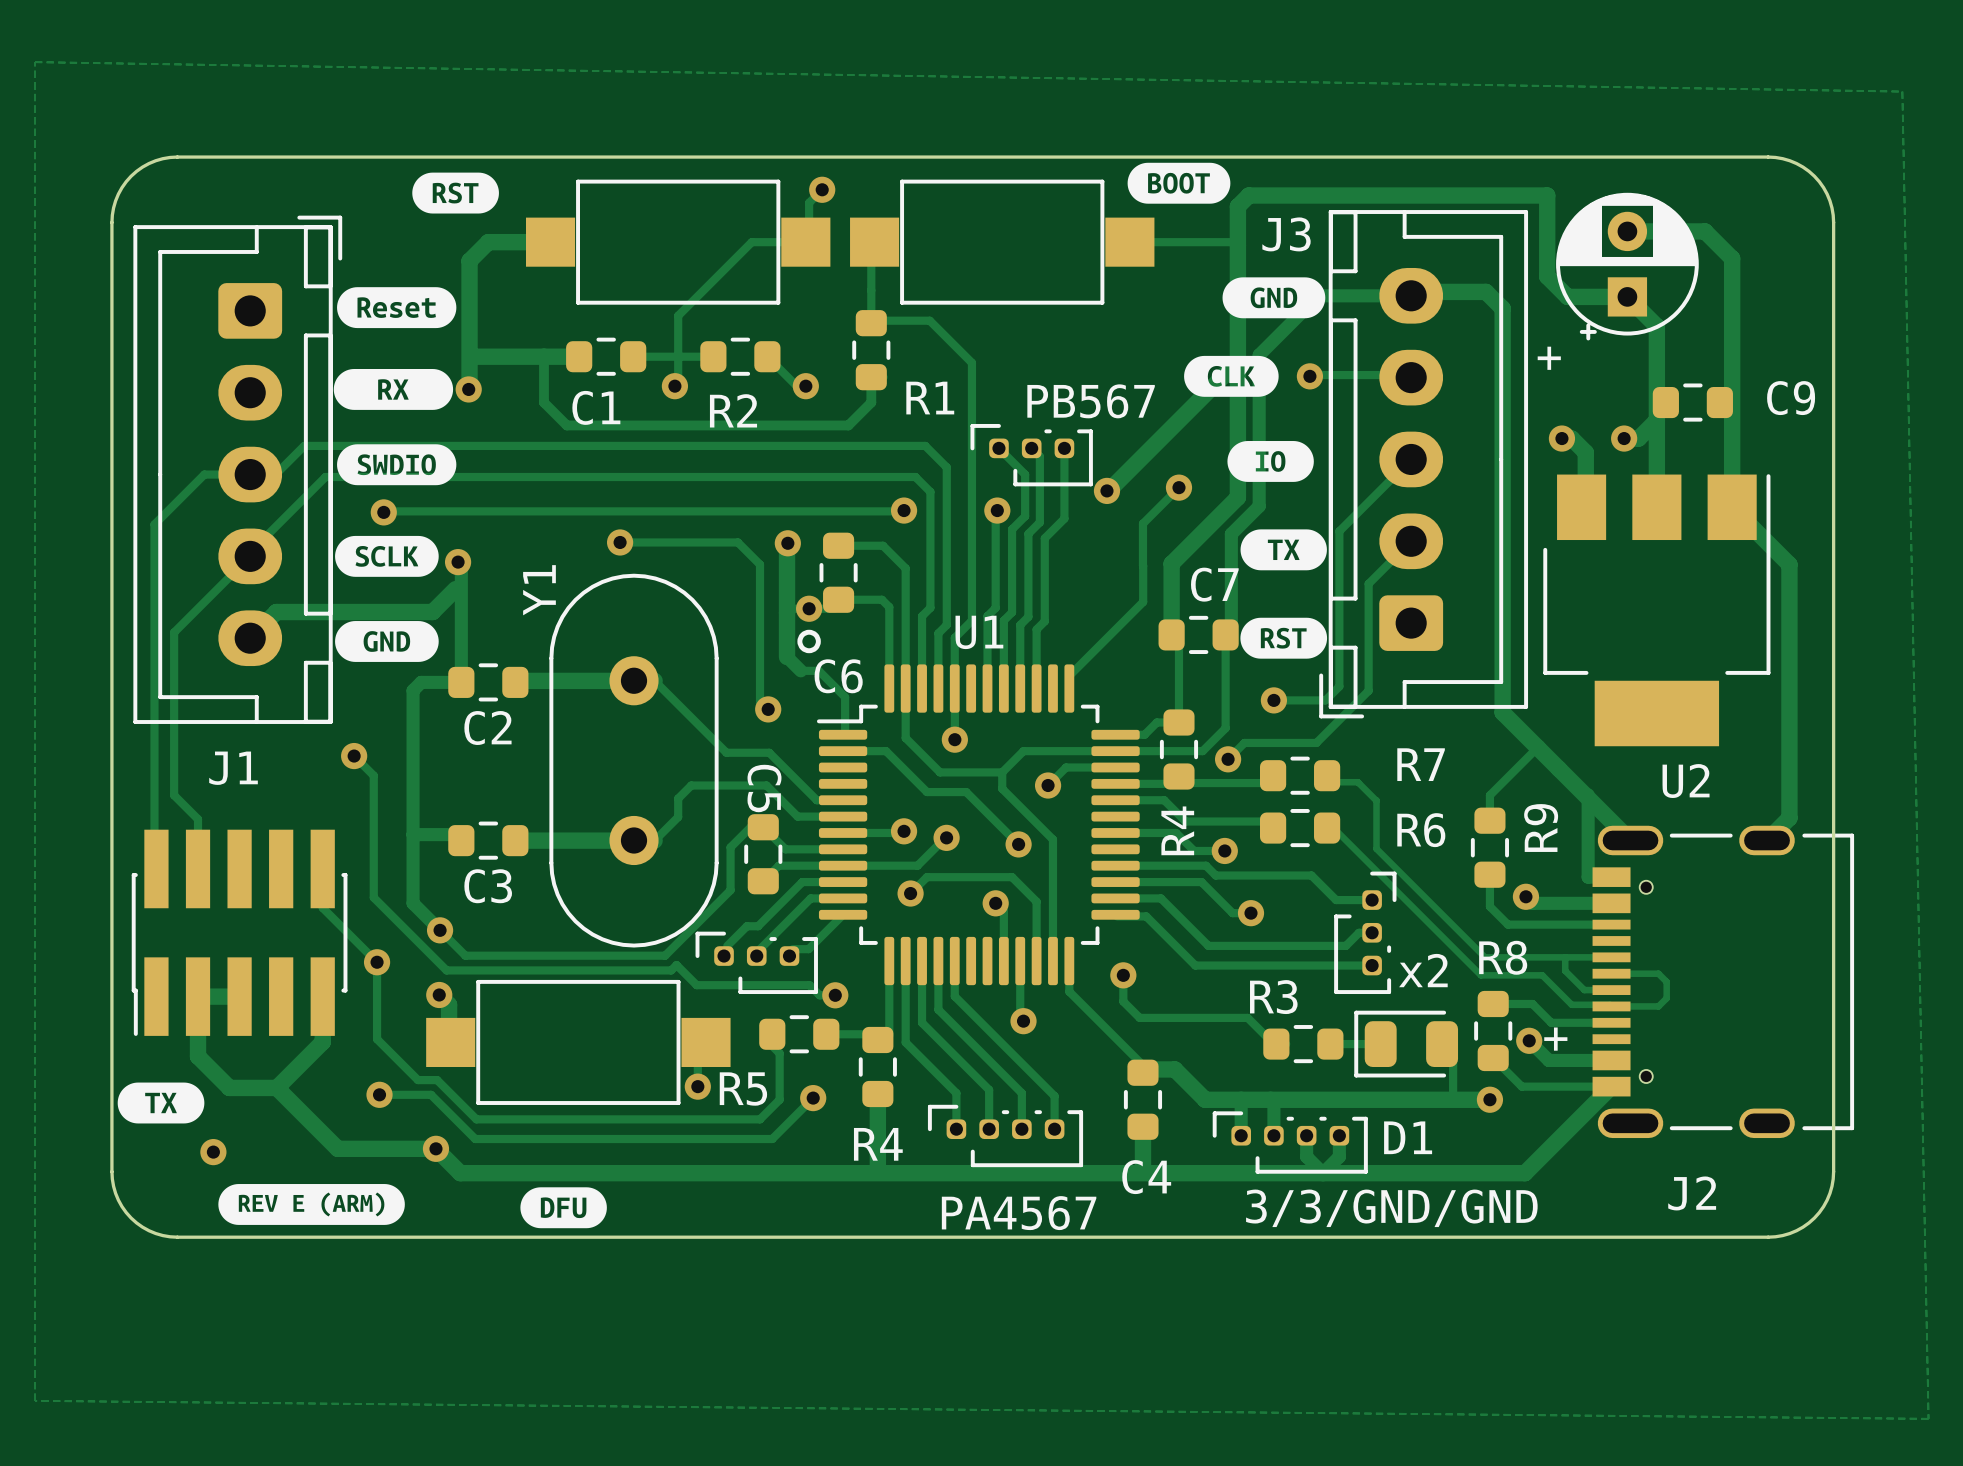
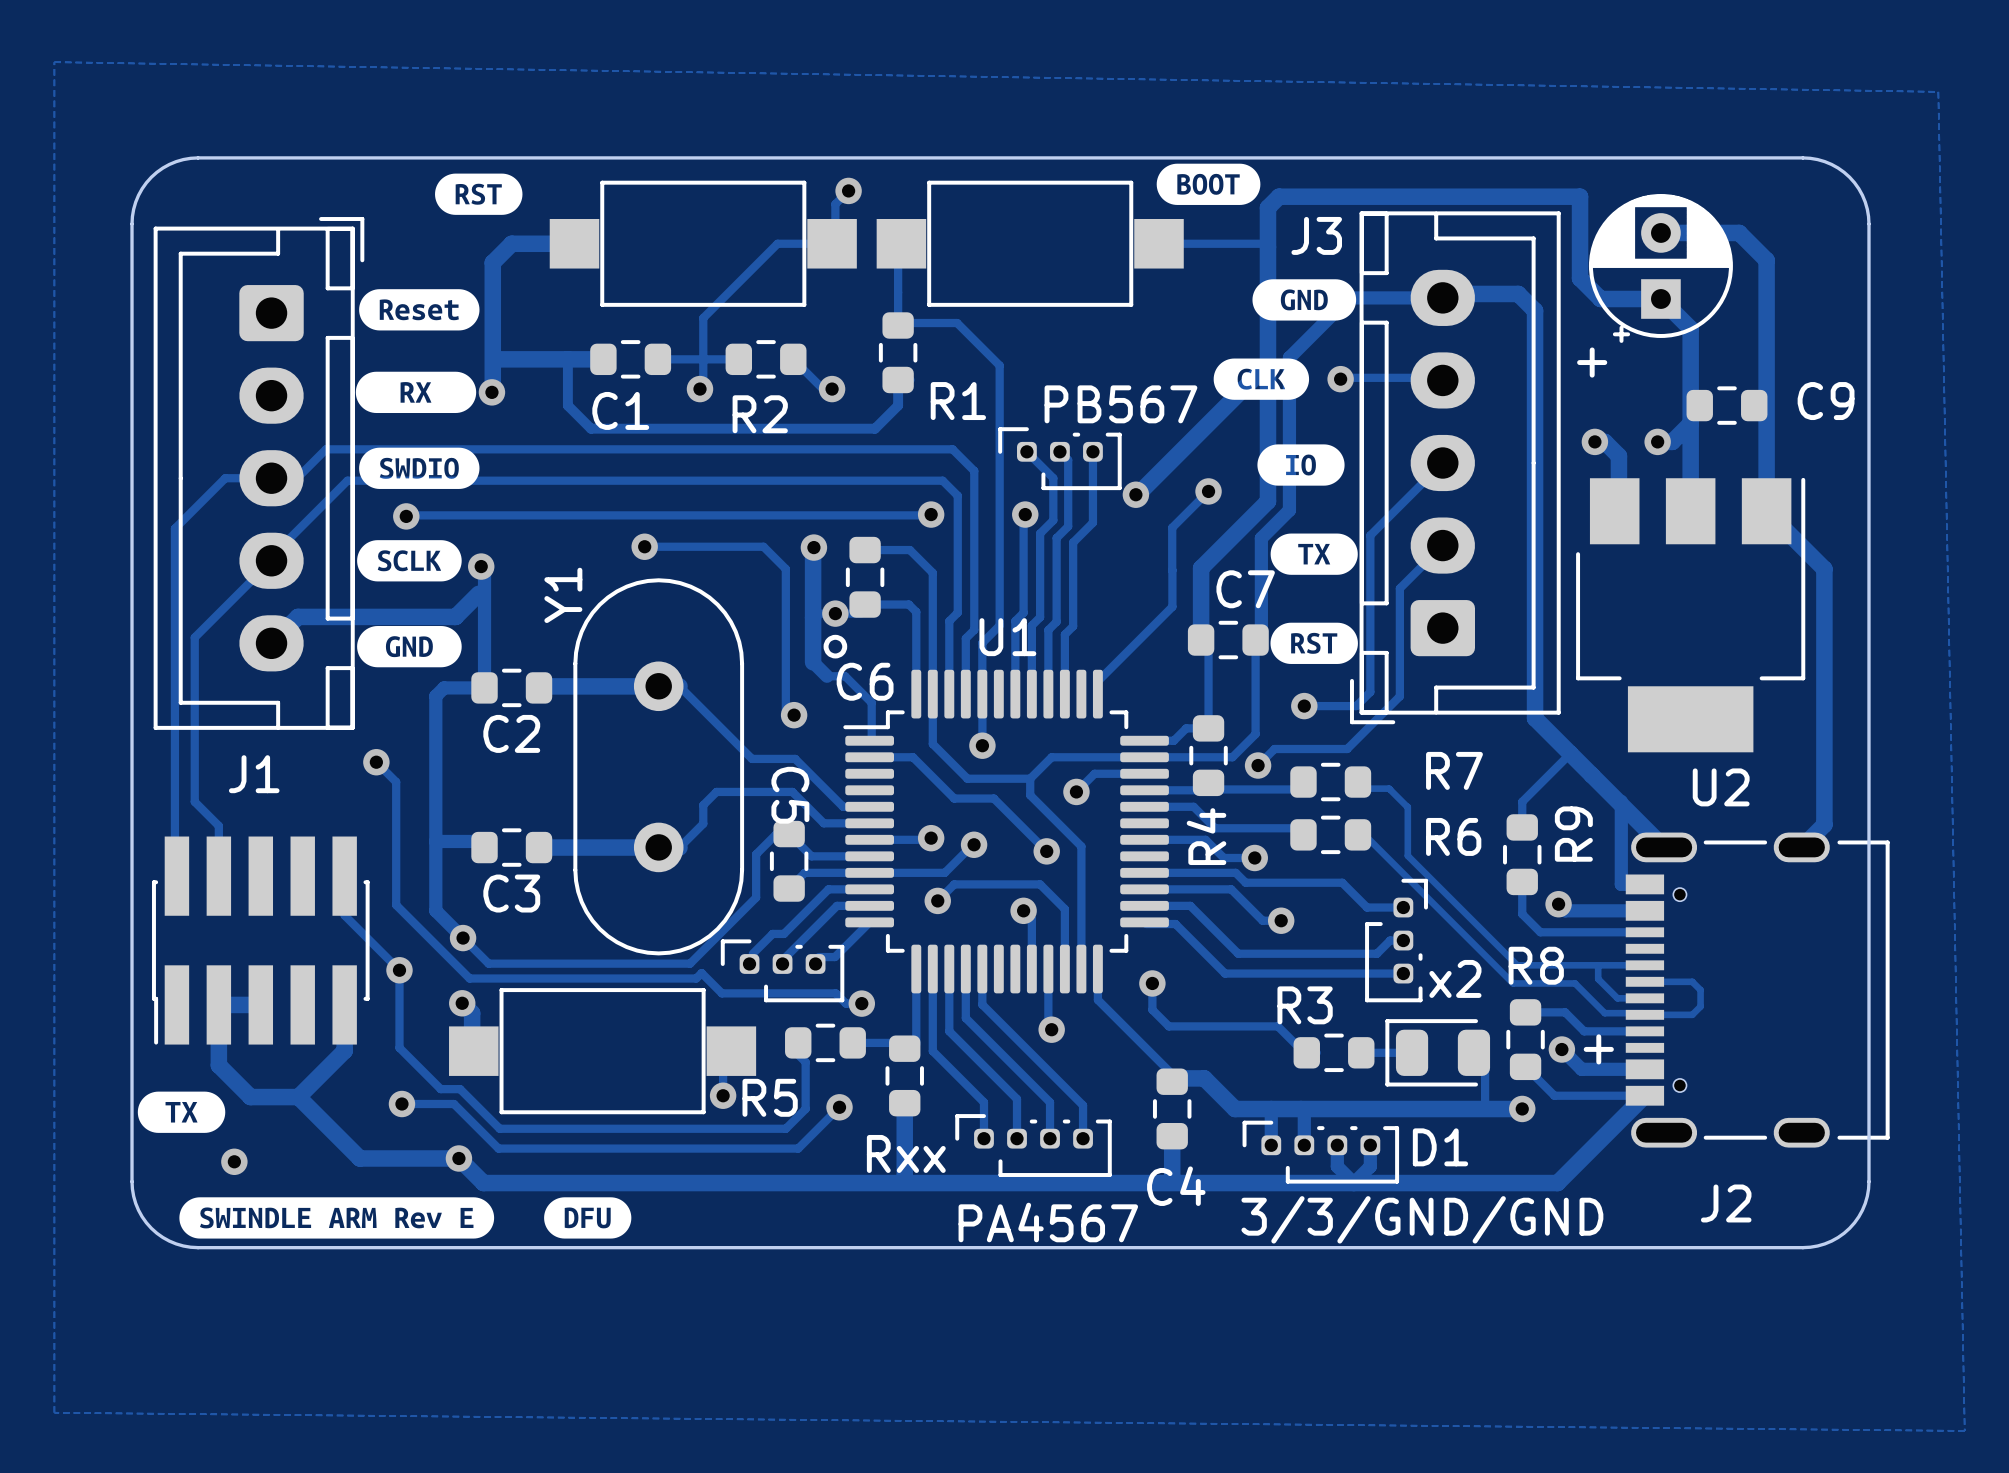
R4 name: R4 (878, 1144) -> Rxx (906, 1153)
drawing shape: [218, 1184, 405, 1225] -> [179, 1197, 495, 1239]

